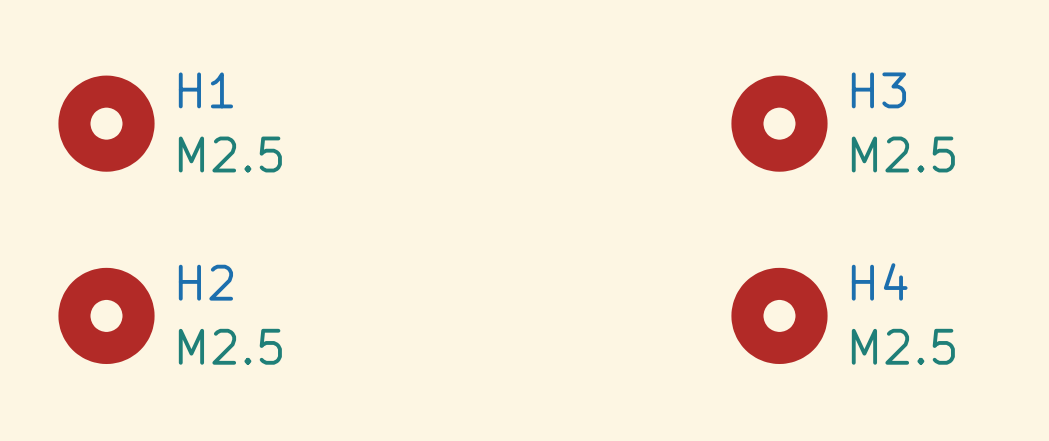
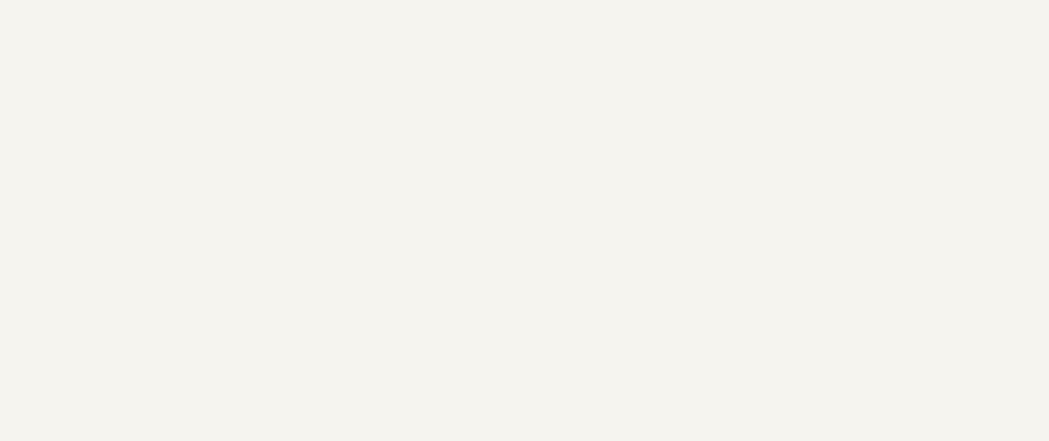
H1: M2.5 (106, 123) -> none
H3: M2.5 (779, 123) -> none
H2: M2.5 (106, 315) -> none
H4: M2.5 (779, 315) -> none

